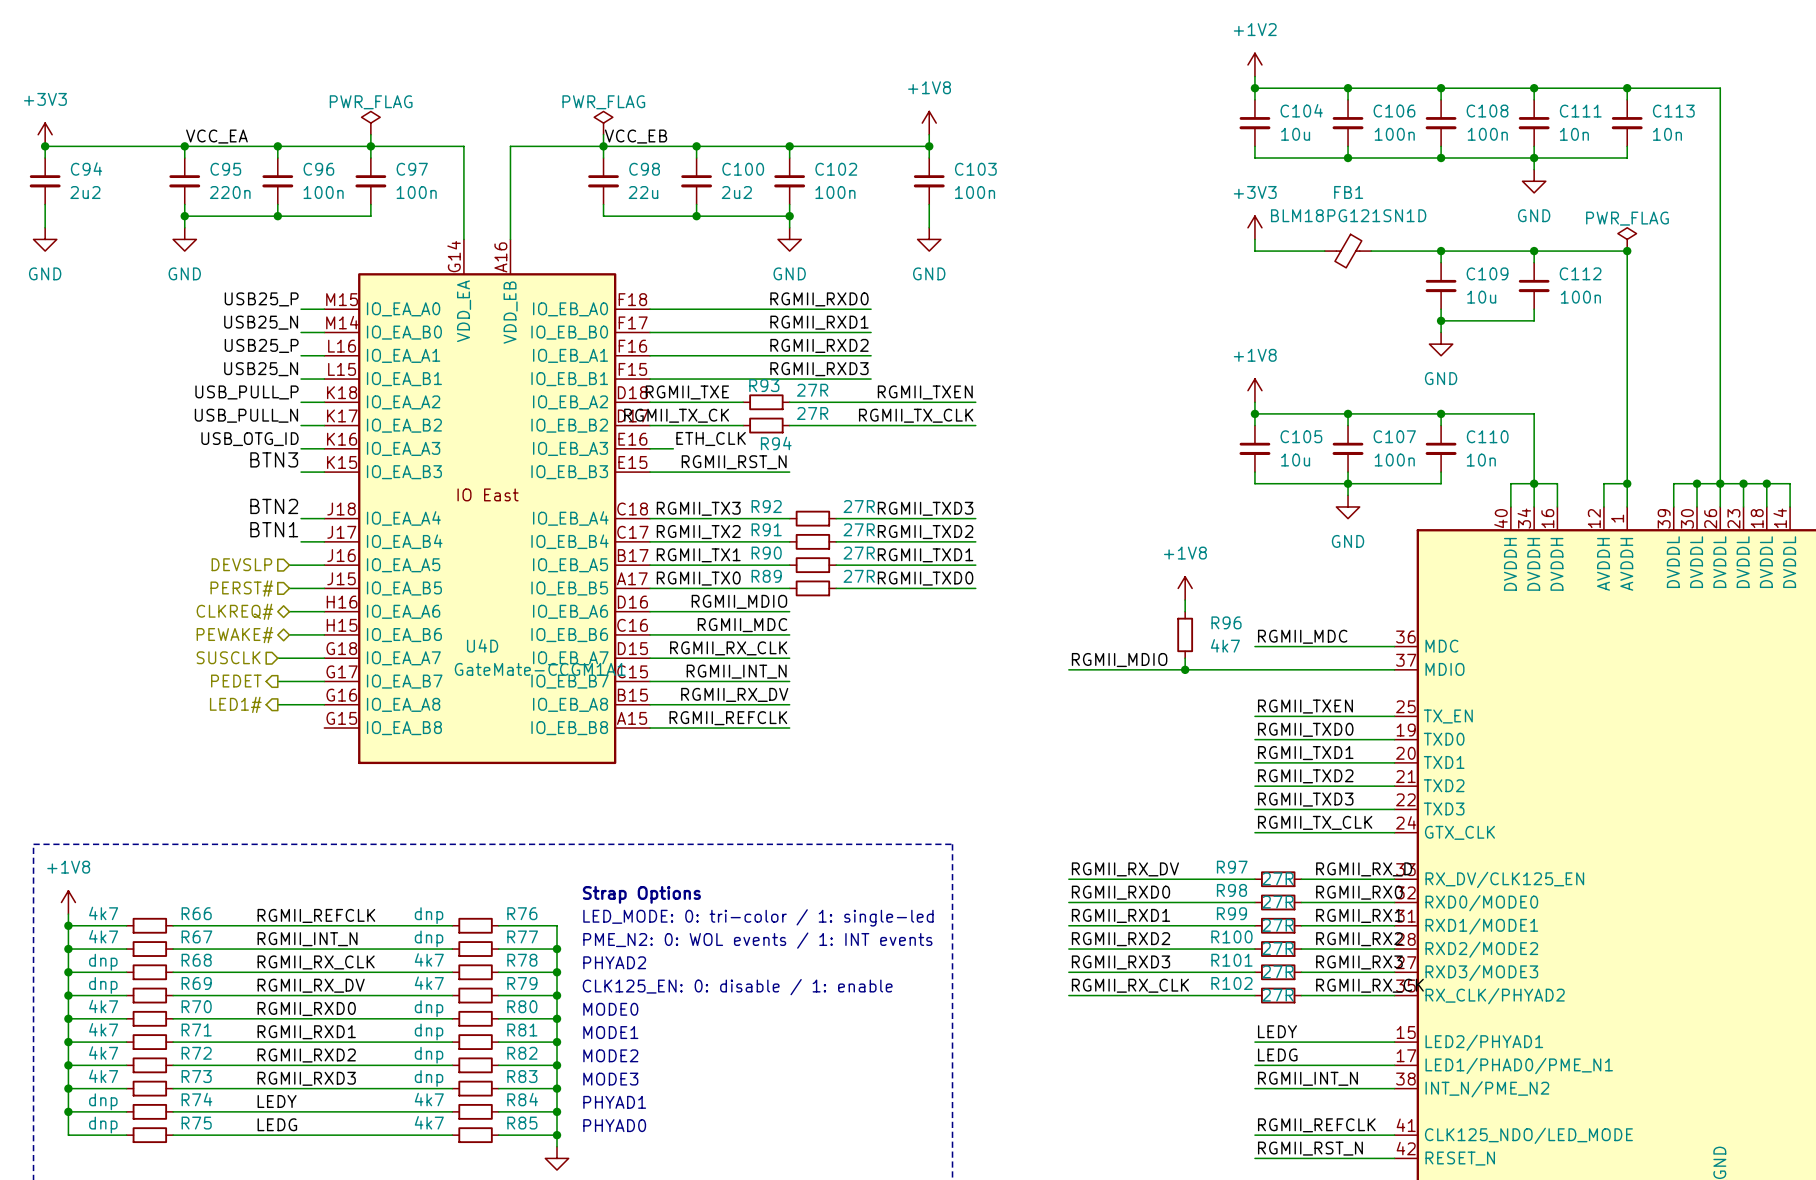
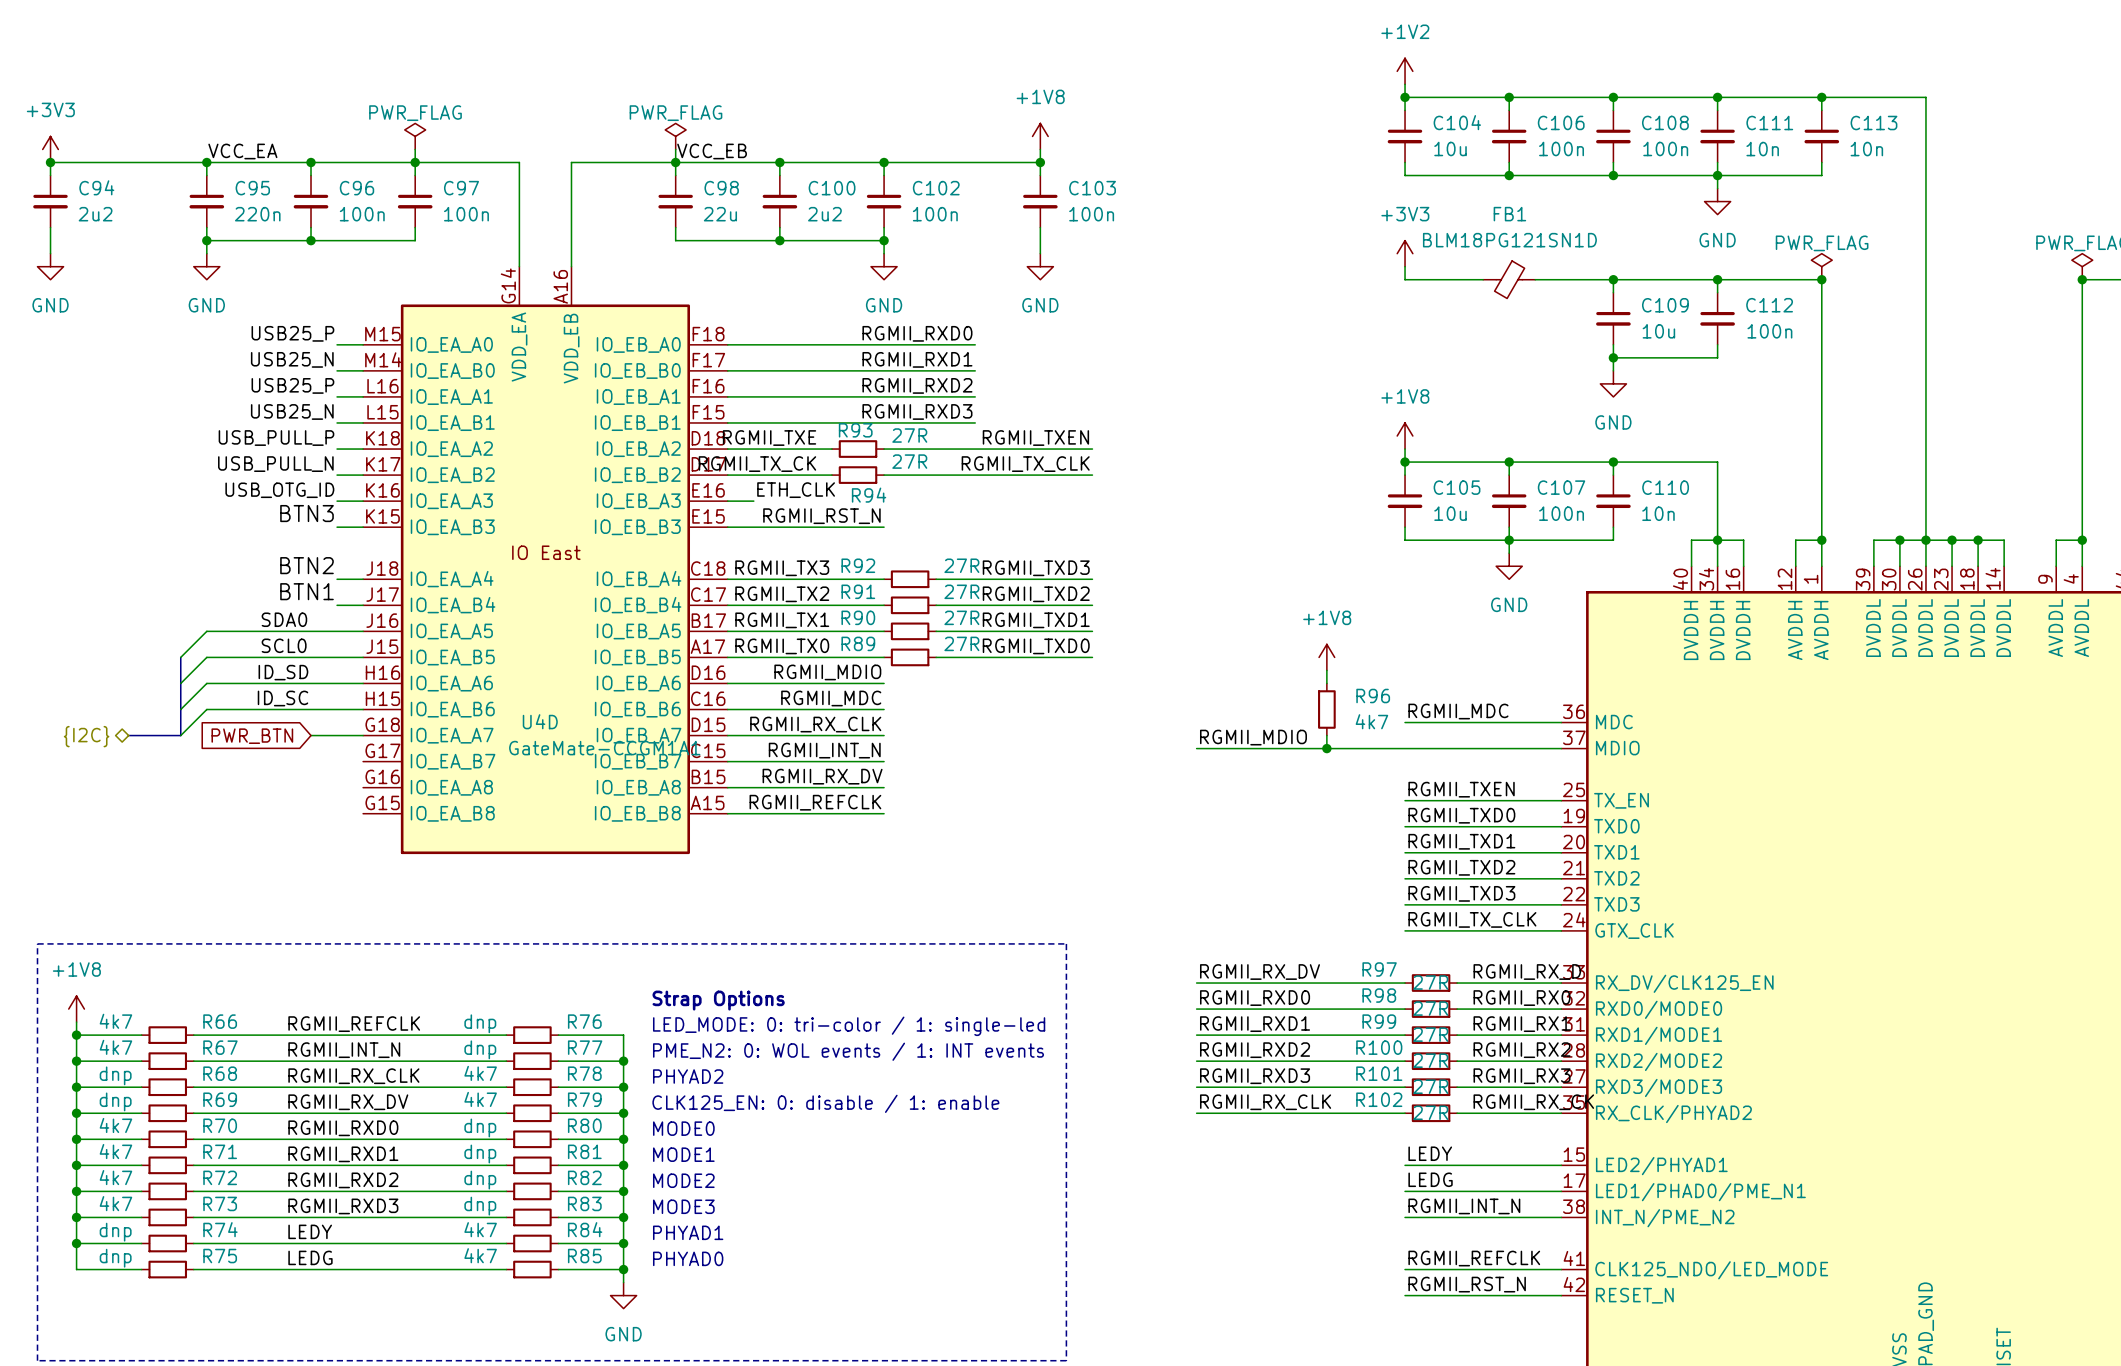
label: none -> SDA0 (284, 619)
hierarchical label: DEVSLP (241, 564) -> none
wire: none -> (324, 631) (206, 631) (180, 657)
label: none -> SCL0 (284, 645)
bus: none -> (180, 657) (180, 735) (128, 735)
hierarchical label: PERST# (241, 588) -> none
wire: none -> (324, 657) (206, 657) (180, 683)
label: none -> ID_SD (283, 672)
hierarchical label: CLKREQ# (234, 611) -> none
wire: none -> (324, 683) (206, 683) (180, 709)
label: none -> ID_SC (282, 698)
wire: none -> (324, 709) (206, 709) (180, 735)
hierarchical label: PEWAKE# (234, 635) -> none
hierarchical label: SUSCLK (228, 657) -> none
global label: none -> PWR_BTN (252, 736)
hierarchical label: none -> {I2C} (86, 736)
hierarchical label: PEDET (236, 681) -> none
wire: (277, 681) (324, 681) -> none
hierarchical label: LED1# (235, 704) -> none
wire: (277, 704) (324, 704) -> none

